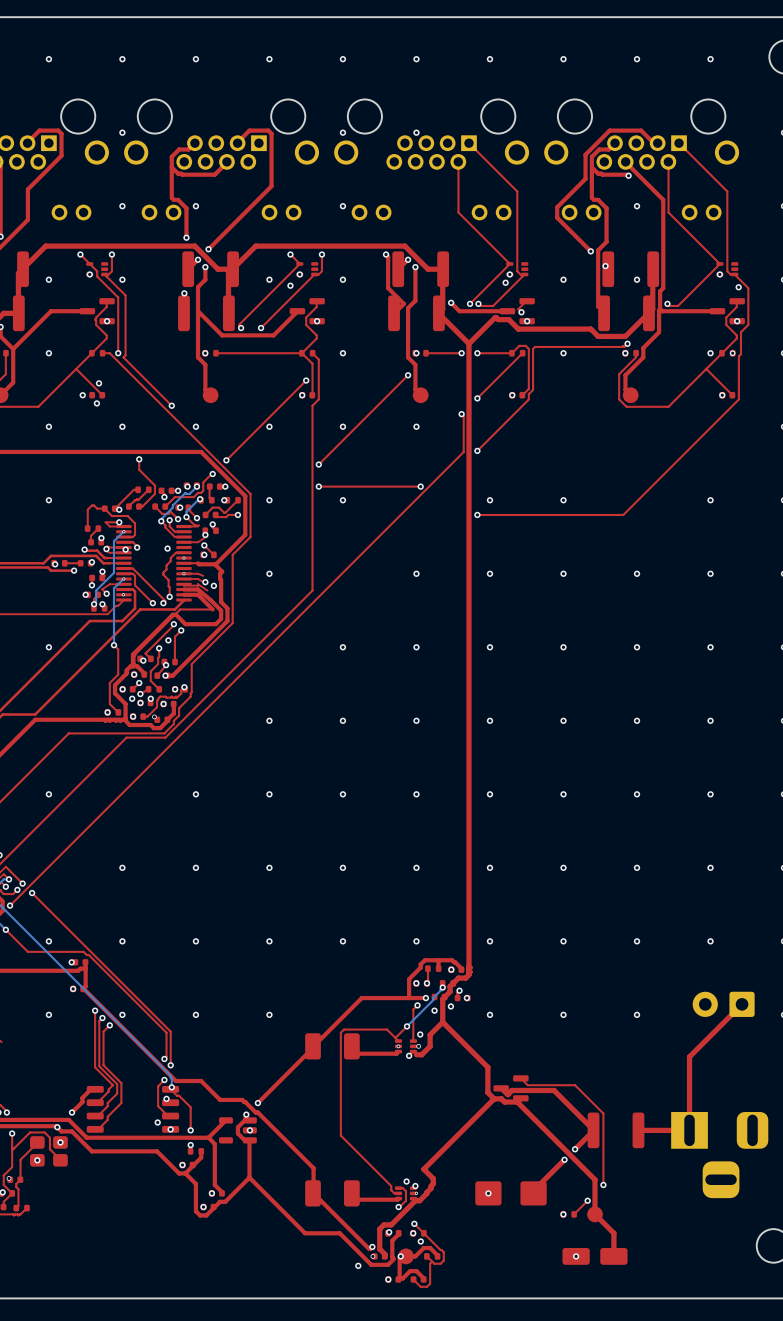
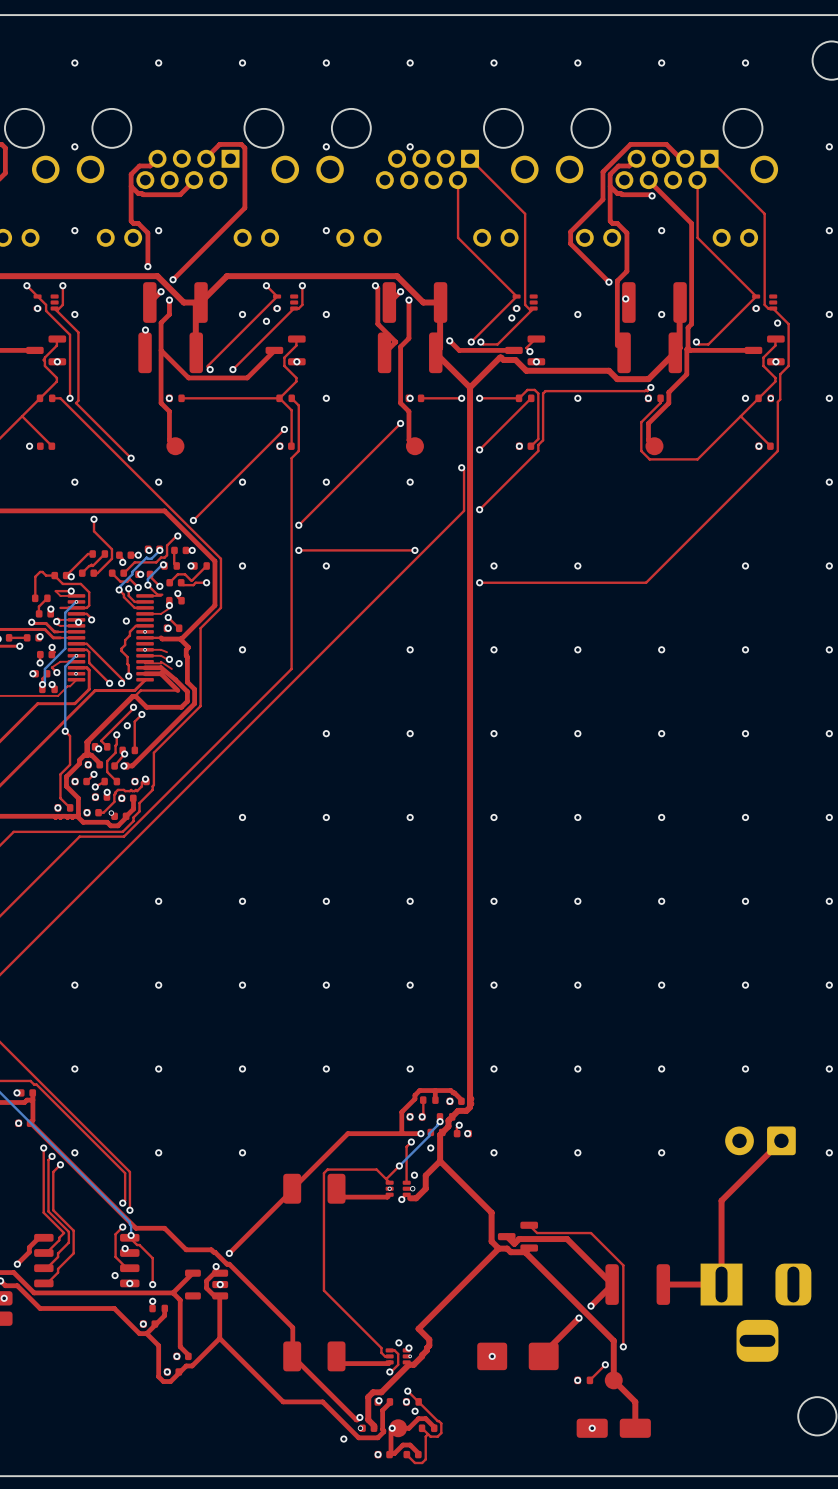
via: (99, 383) -> none
via: (96, 403) -> none
top track: none -> (76, 607) (60, 607)
via: (132, 698) -> none
via: (450, 1006) -> none

